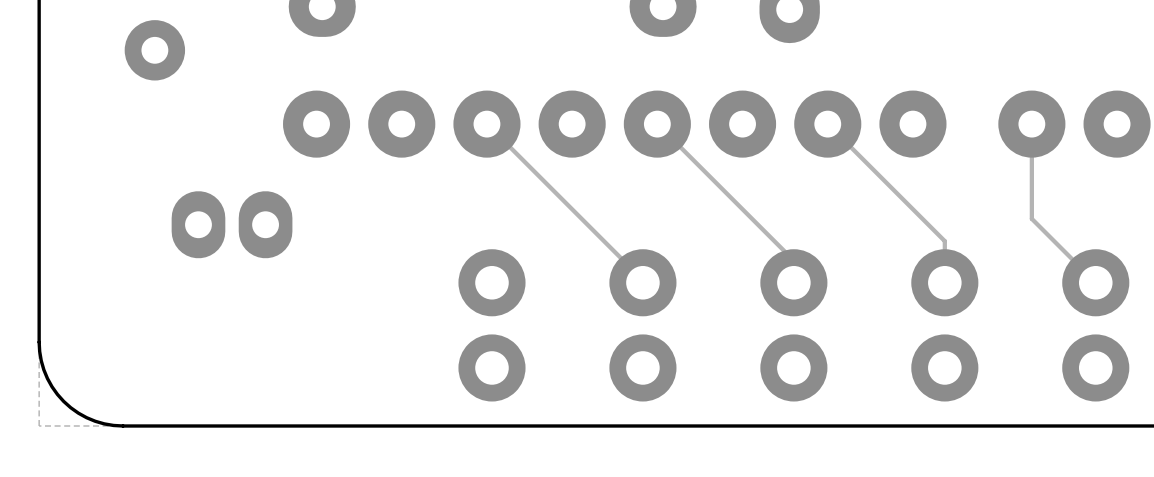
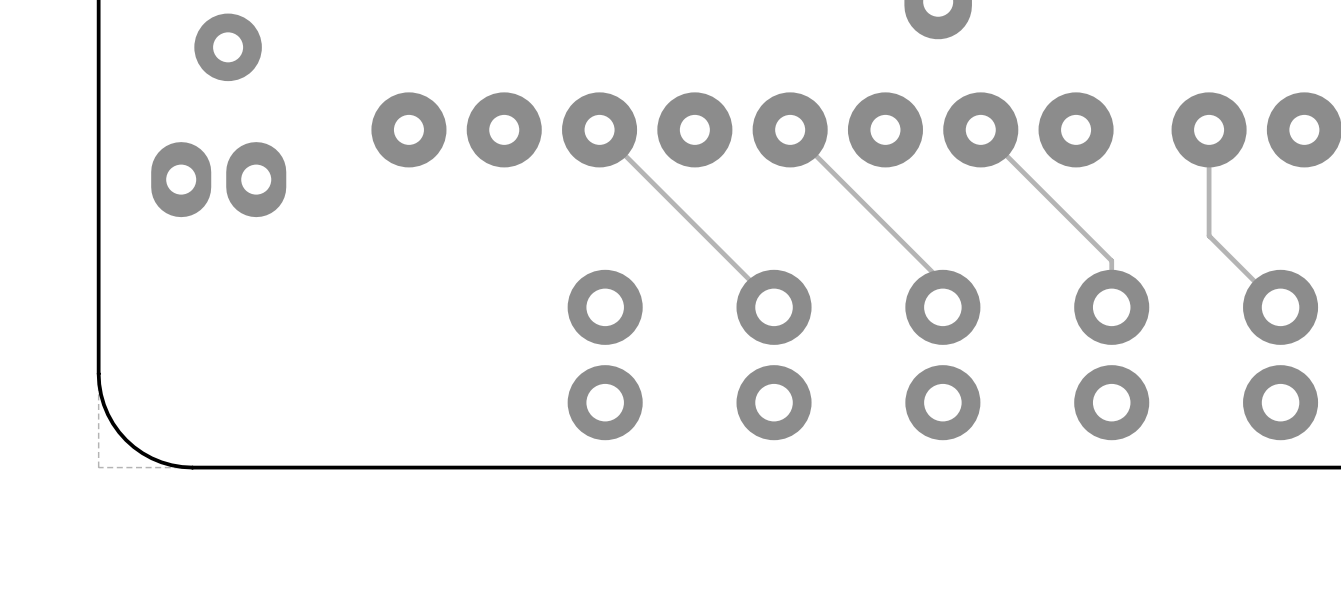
part position: (232, 224) -> (218, 179)

